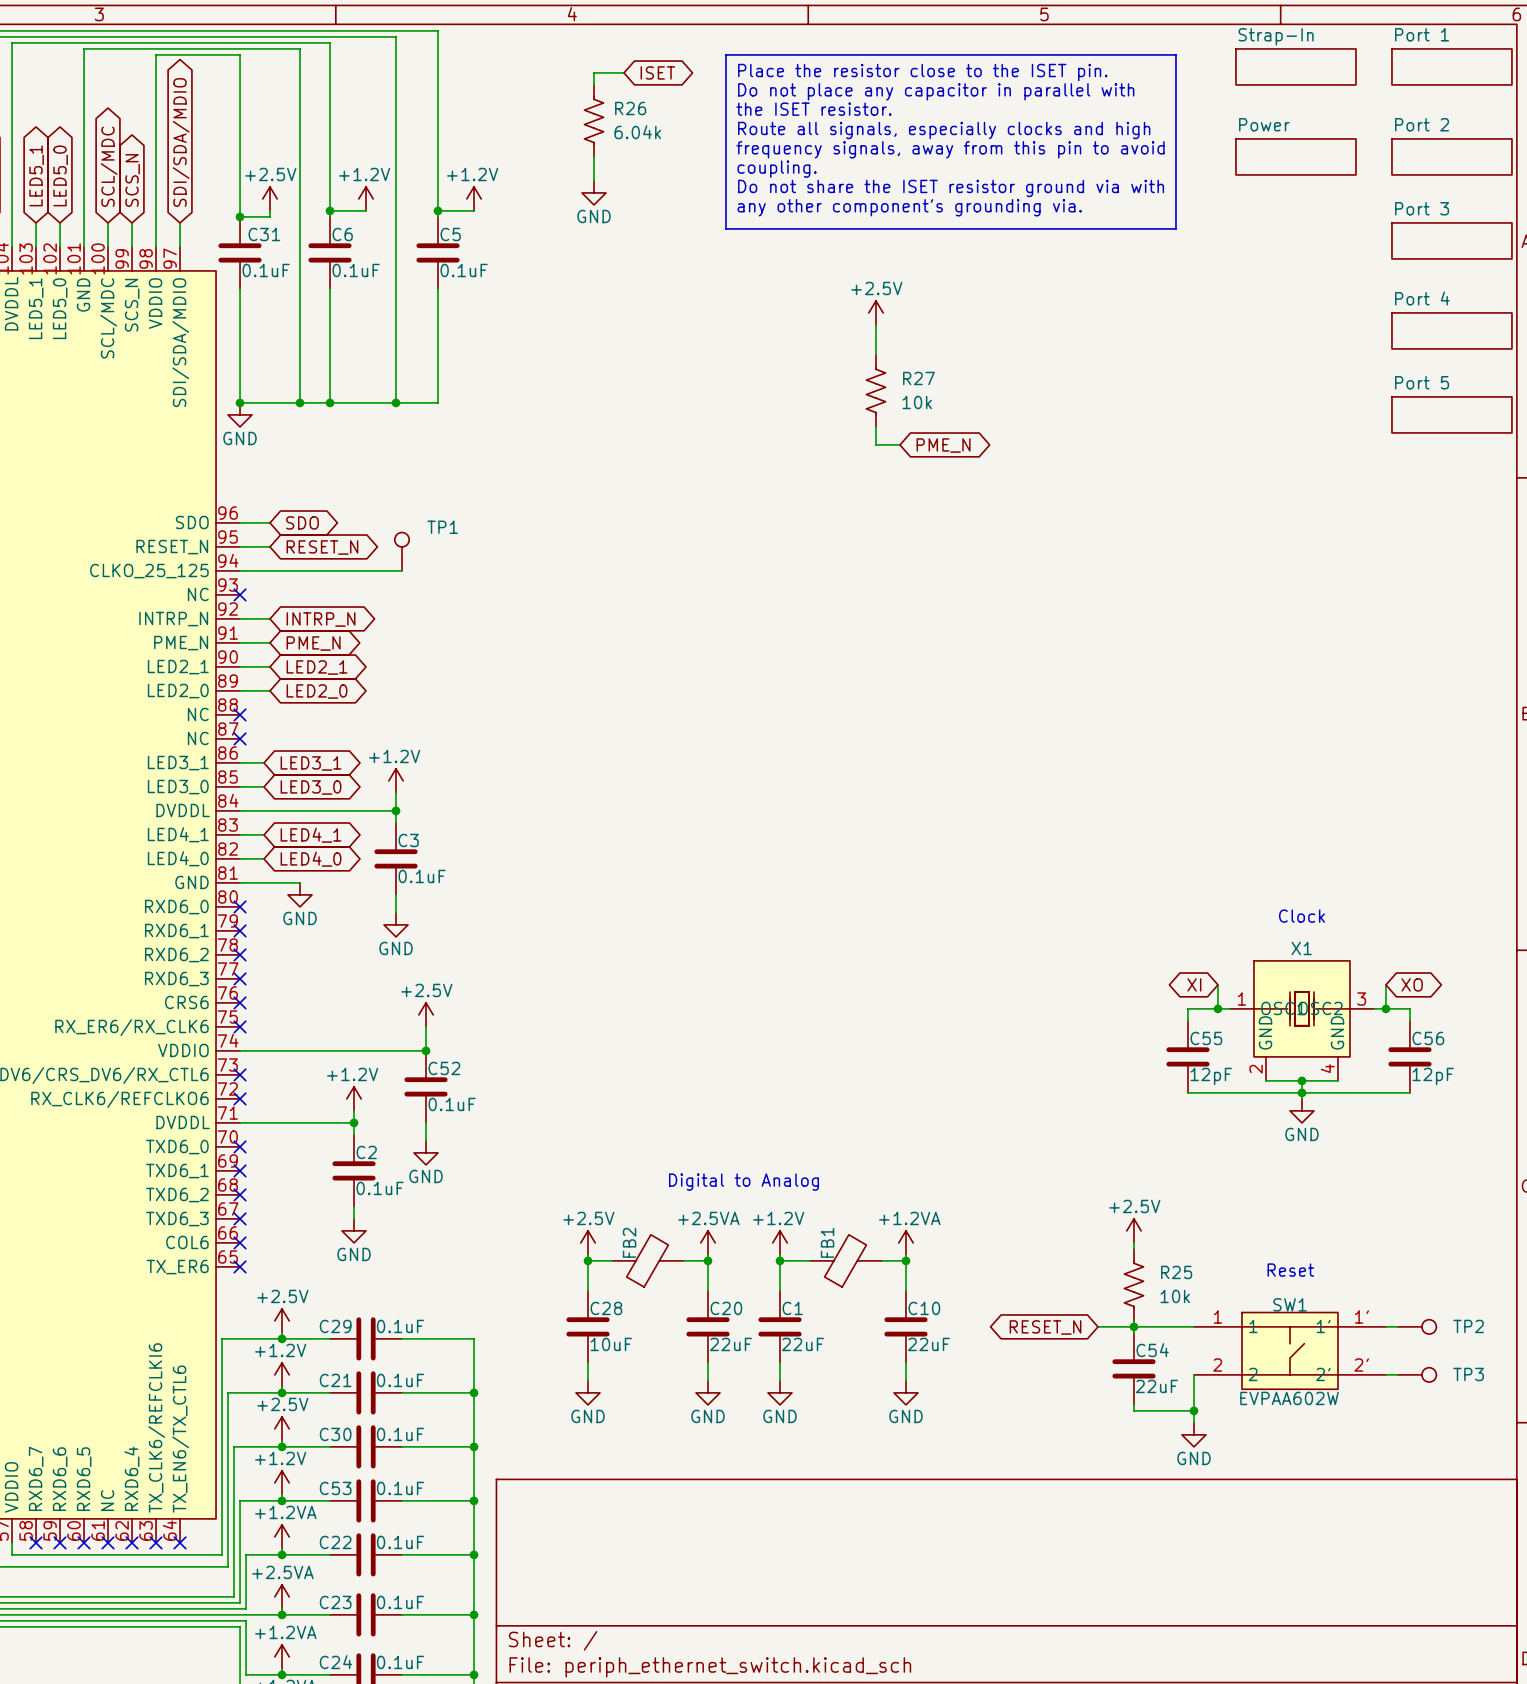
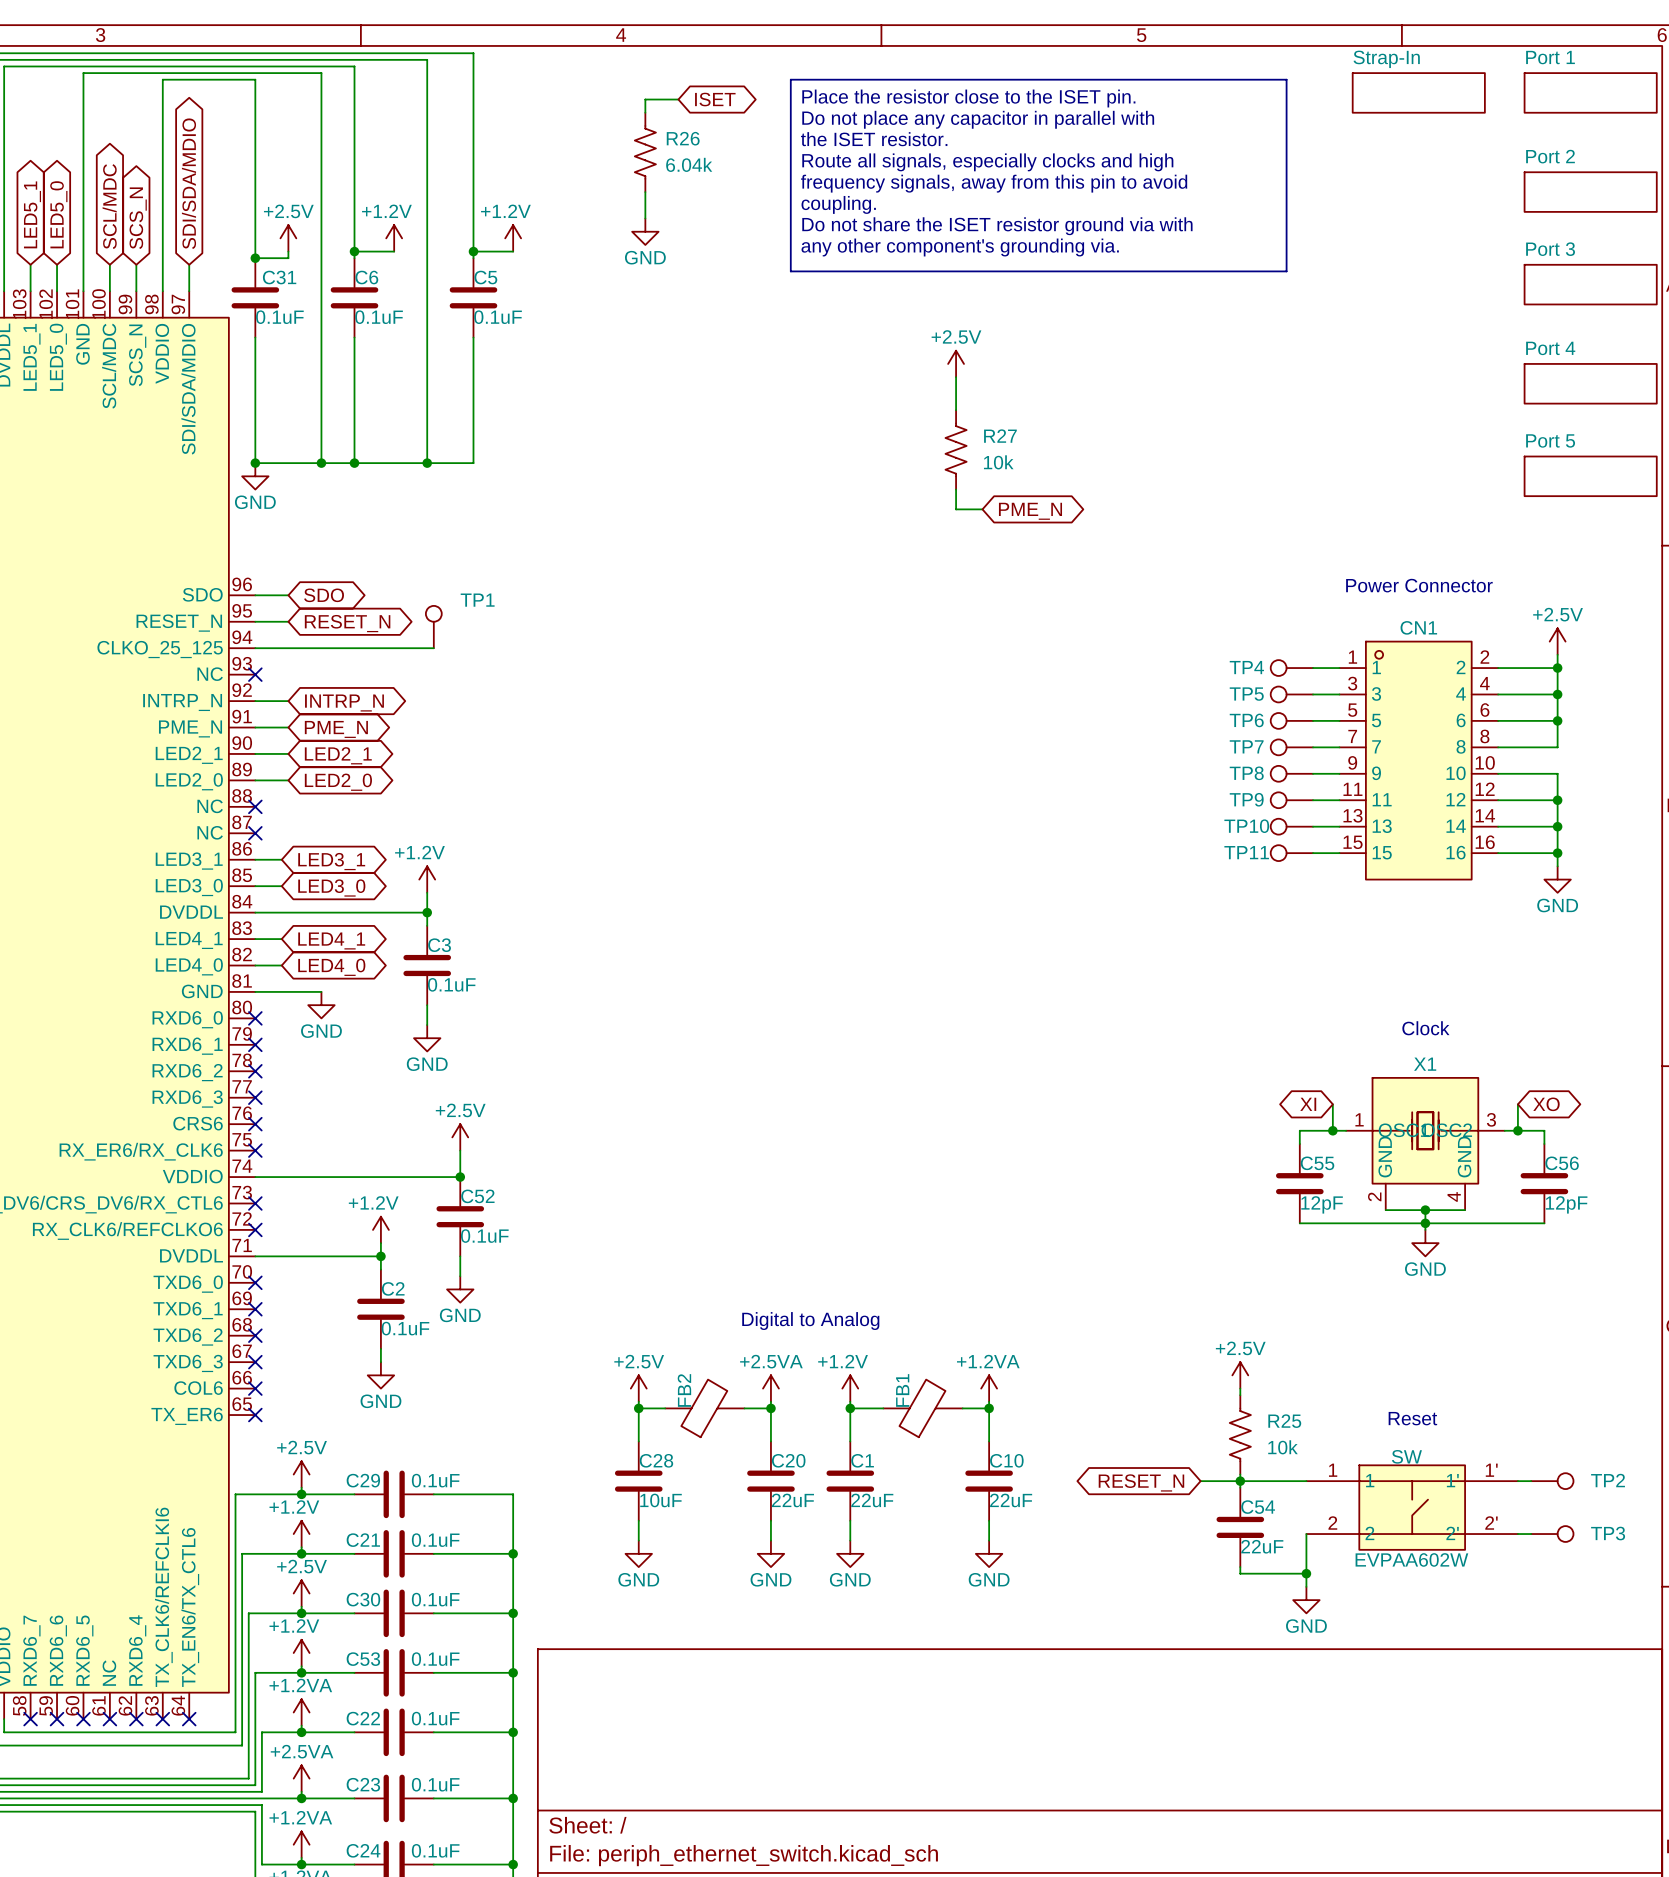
sheet Power: (1295, 156) -> none
text: none -> Power Connector (1419, 585)
power symbol: none -> +2.5V (1557, 641)
wire: none -> (1557, 654) (1557, 747) (1498, 747)
TP4: none -> (1291, 668)
wire: none -> (1313, 668) (1339, 668)
wire: none -> (1498, 668) (1557, 668)
junction: none -> (1557, 668)
TP5: none -> (1291, 694)
wire: none -> (1313, 694) (1339, 694)
wire: none -> (1498, 694) (1557, 694)
junction: none -> (1557, 694)
TP6: none -> (1291, 720)
wire: none -> (1313, 720) (1339, 720)
wire: none -> (1498, 720) (1557, 720)
junction: none -> (1557, 720)
TP7: none -> (1291, 747)
wire: none -> (1313, 747) (1339, 747)
CN1: none -> (1418, 760)
TP8: none -> (1291, 773)
wire: none -> (1313, 773) (1339, 773)
wire: none -> (1498, 773) (1557, 773) (1557, 866)
TP9: none -> (1291, 800)
wire: none -> (1313, 800) (1339, 800)
wire: none -> (1498, 800) (1557, 800)
junction: none -> (1557, 800)
TP10: none -> (1291, 826)
wire: none -> (1313, 826) (1339, 826)
wire: none -> (1498, 826) (1557, 826)
junction: none -> (1557, 826)
TP11: none -> (1291, 853)
wire: none -> (1313, 853) (1339, 853)
wire: none -> (1498, 853) (1557, 853)
junction: none -> (1557, 853)
power symbol: none -> GND (1557, 879)
SW1 name: SW1 (1290, 1304) -> SW (1406, 1456)

